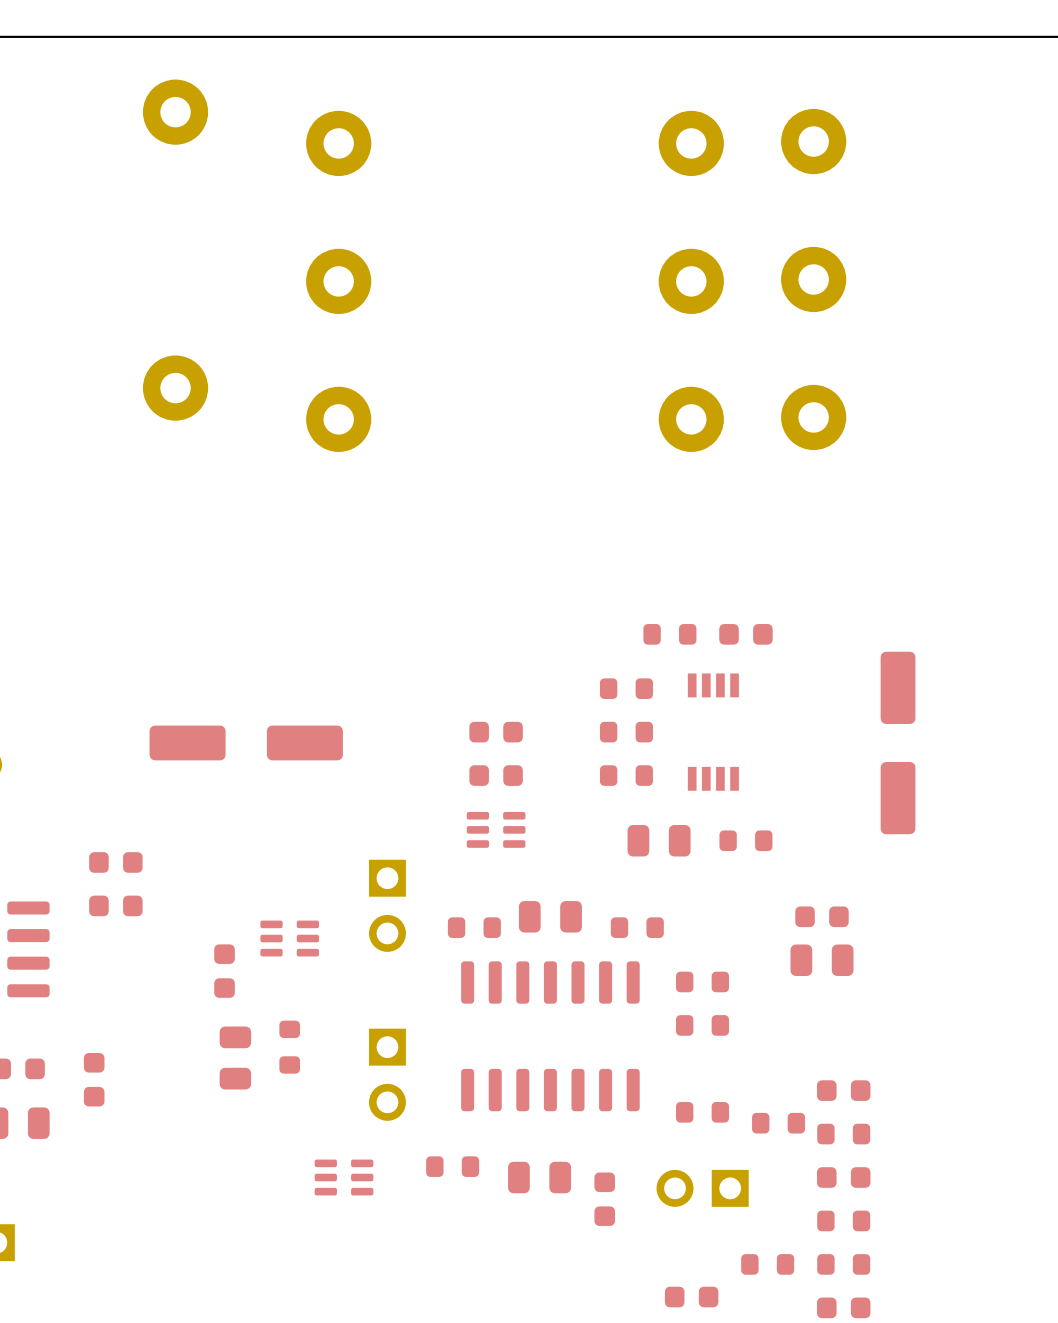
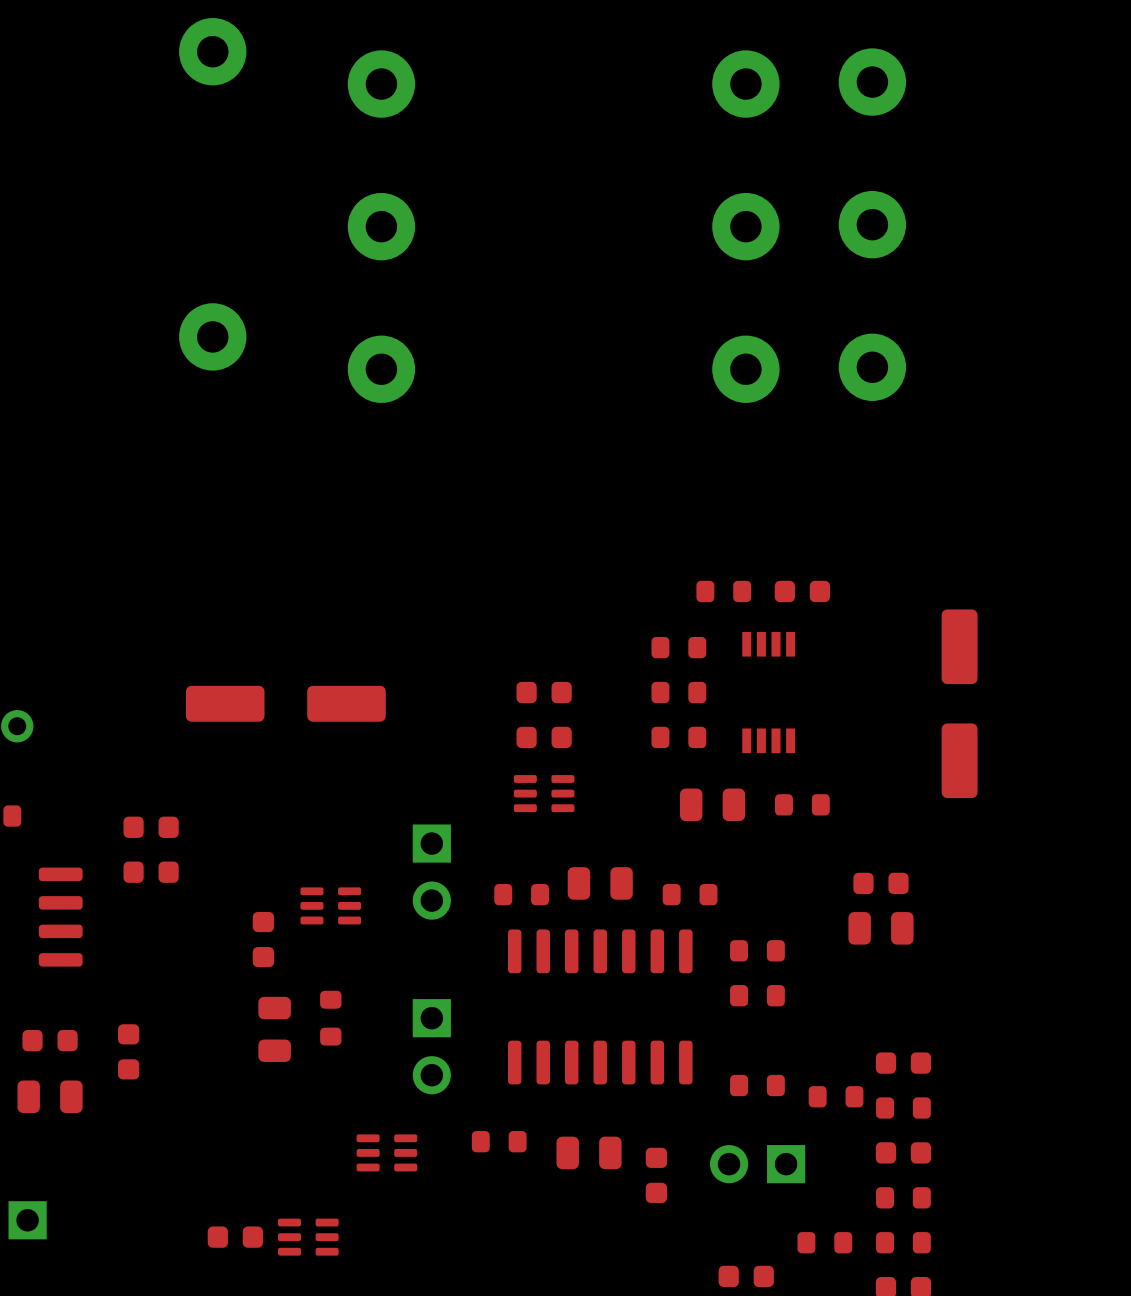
part: none -> (235, 1237)
part: none -> (308, 1237)

